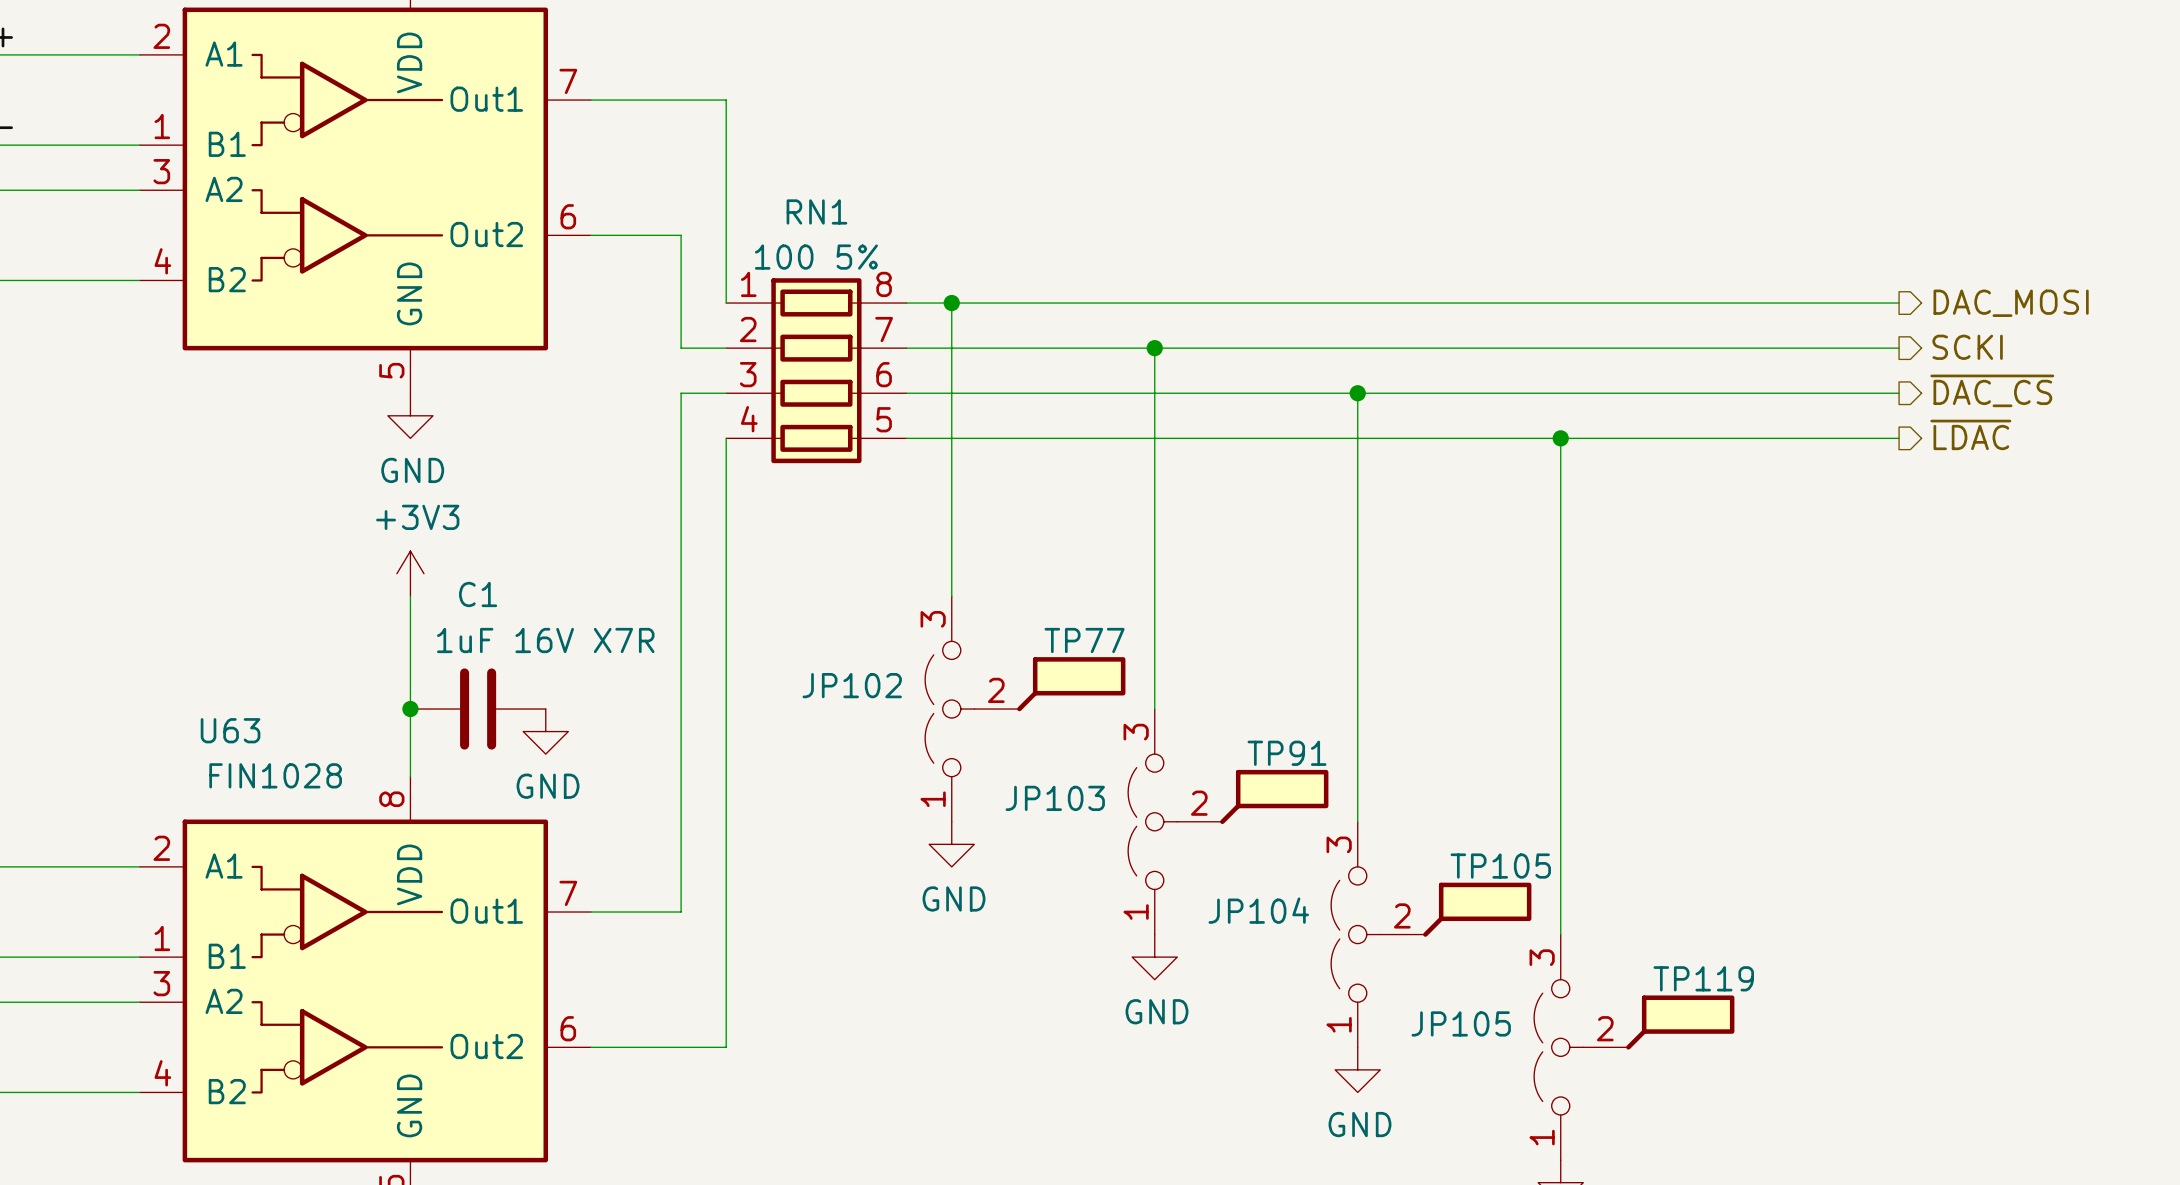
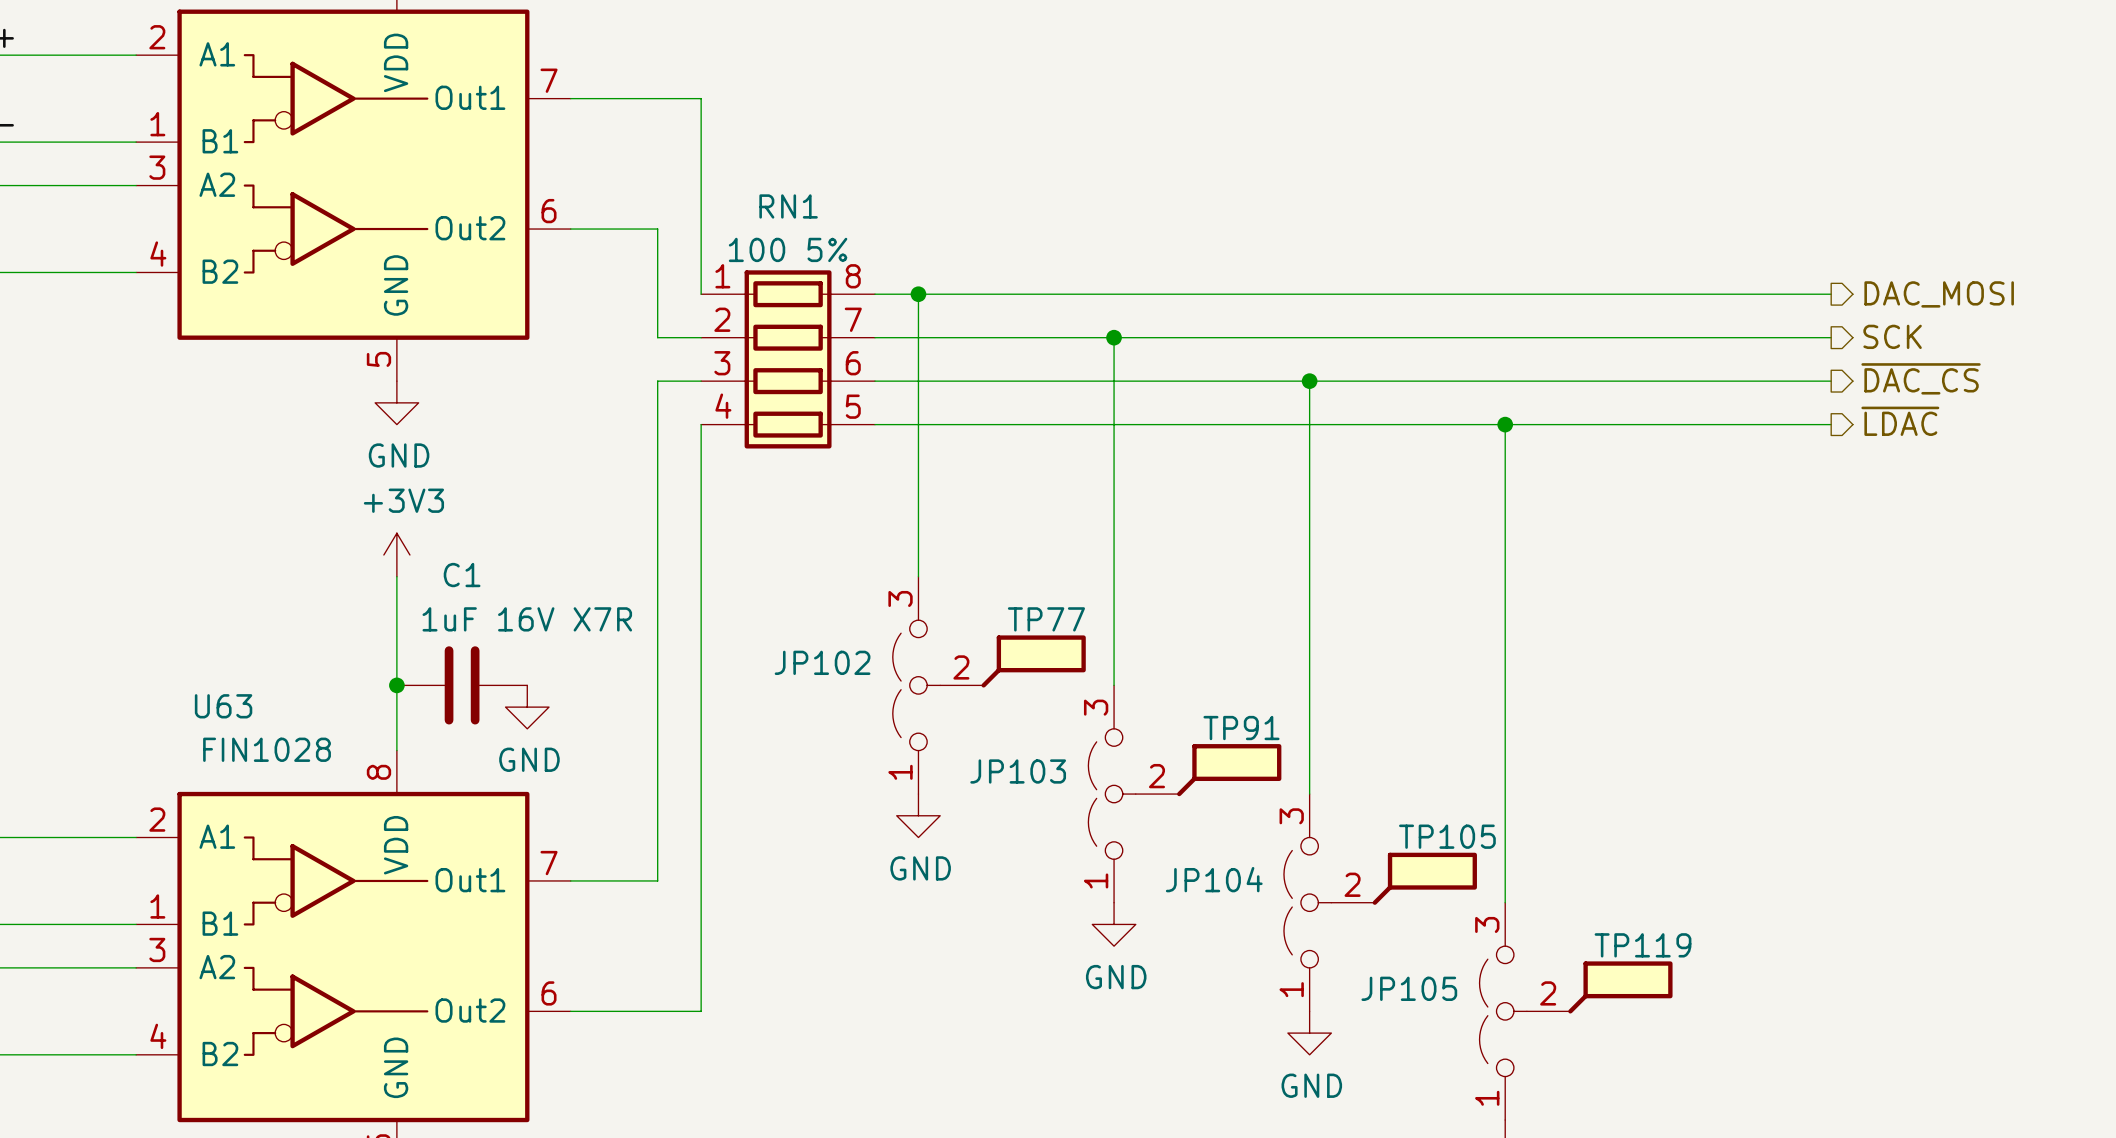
hierarchical label: SCKI (1967, 347) -> SCK (1892, 336)

